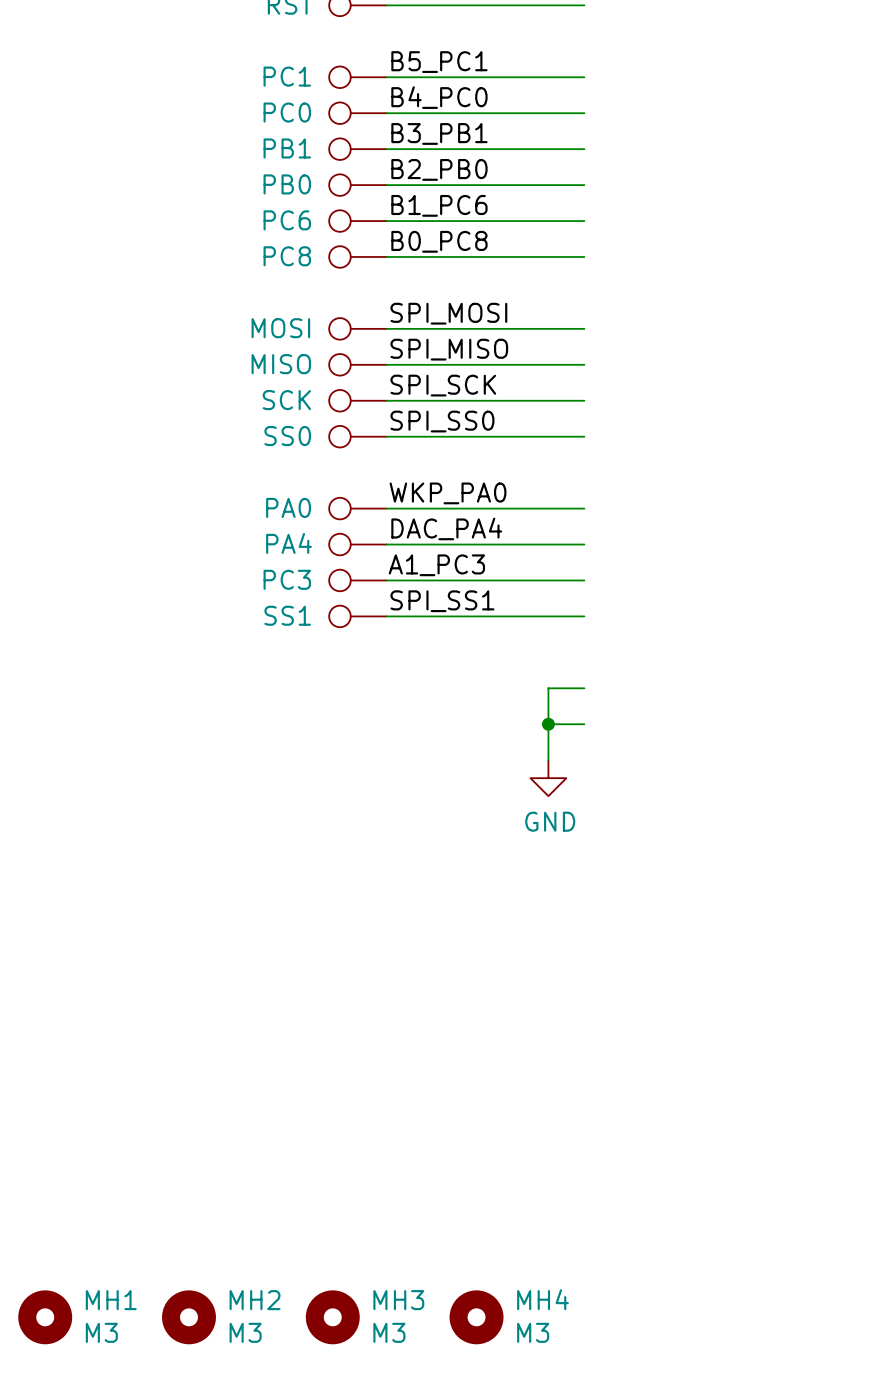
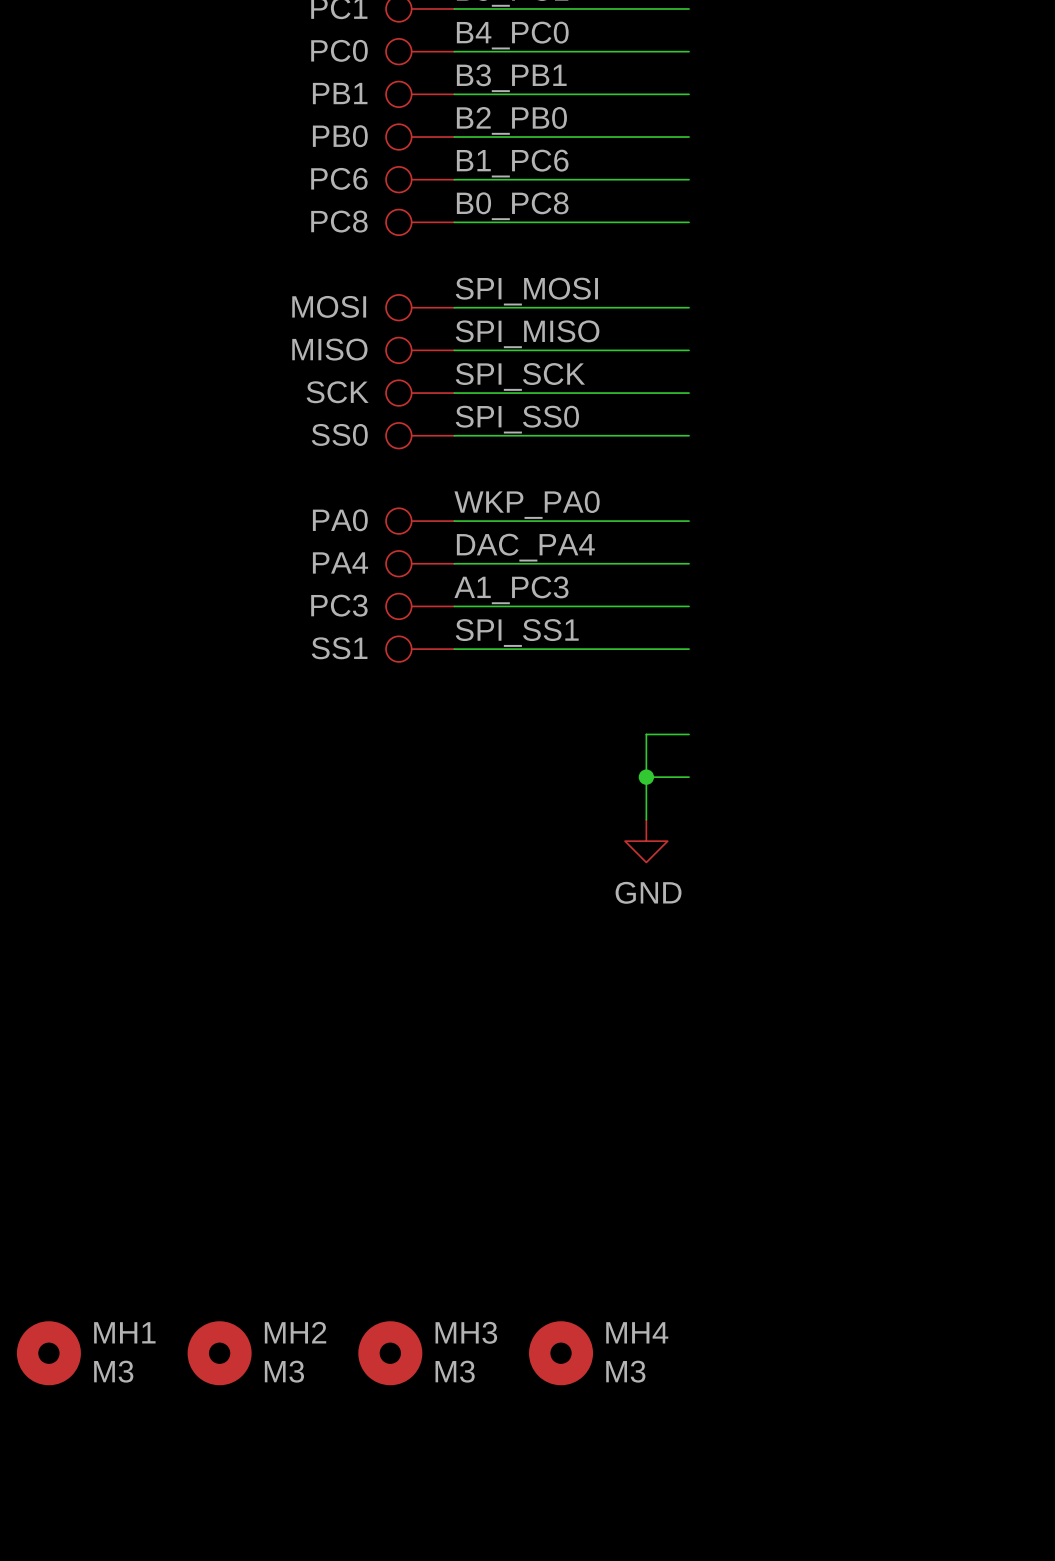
MH1 position: (45, 1317) -> (48, 1353)
MH2 position: (188, 1317) -> (219, 1353)
MH3 position: (332, 1317) -> (390, 1353)
MH4 position: (476, 1317) -> (561, 1353)

